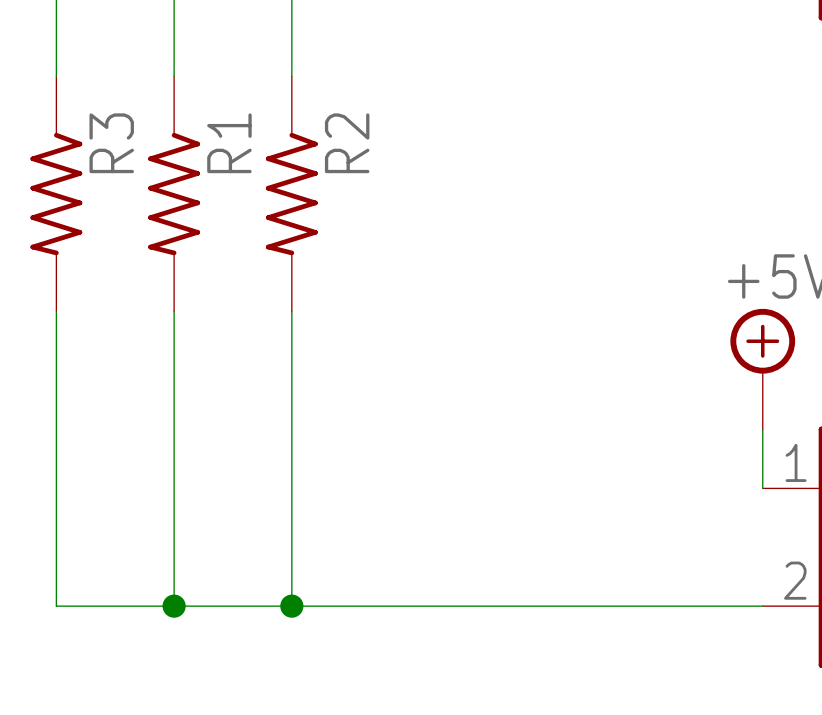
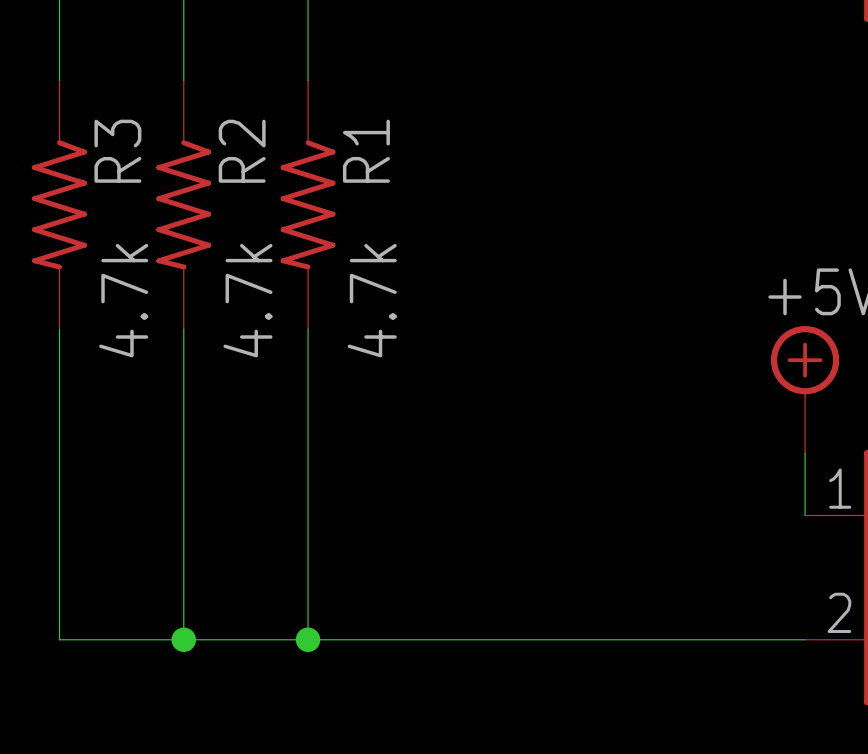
R1 name: R1 (229, 143) -> R2 (242, 151)
R2 name: R2 (347, 143) -> R1 (366, 151)
R3 value: none -> 4.7k (123, 300)
R1 value: none -> 4.7k (247, 300)
R2 value: none -> 4.7k (372, 300)

